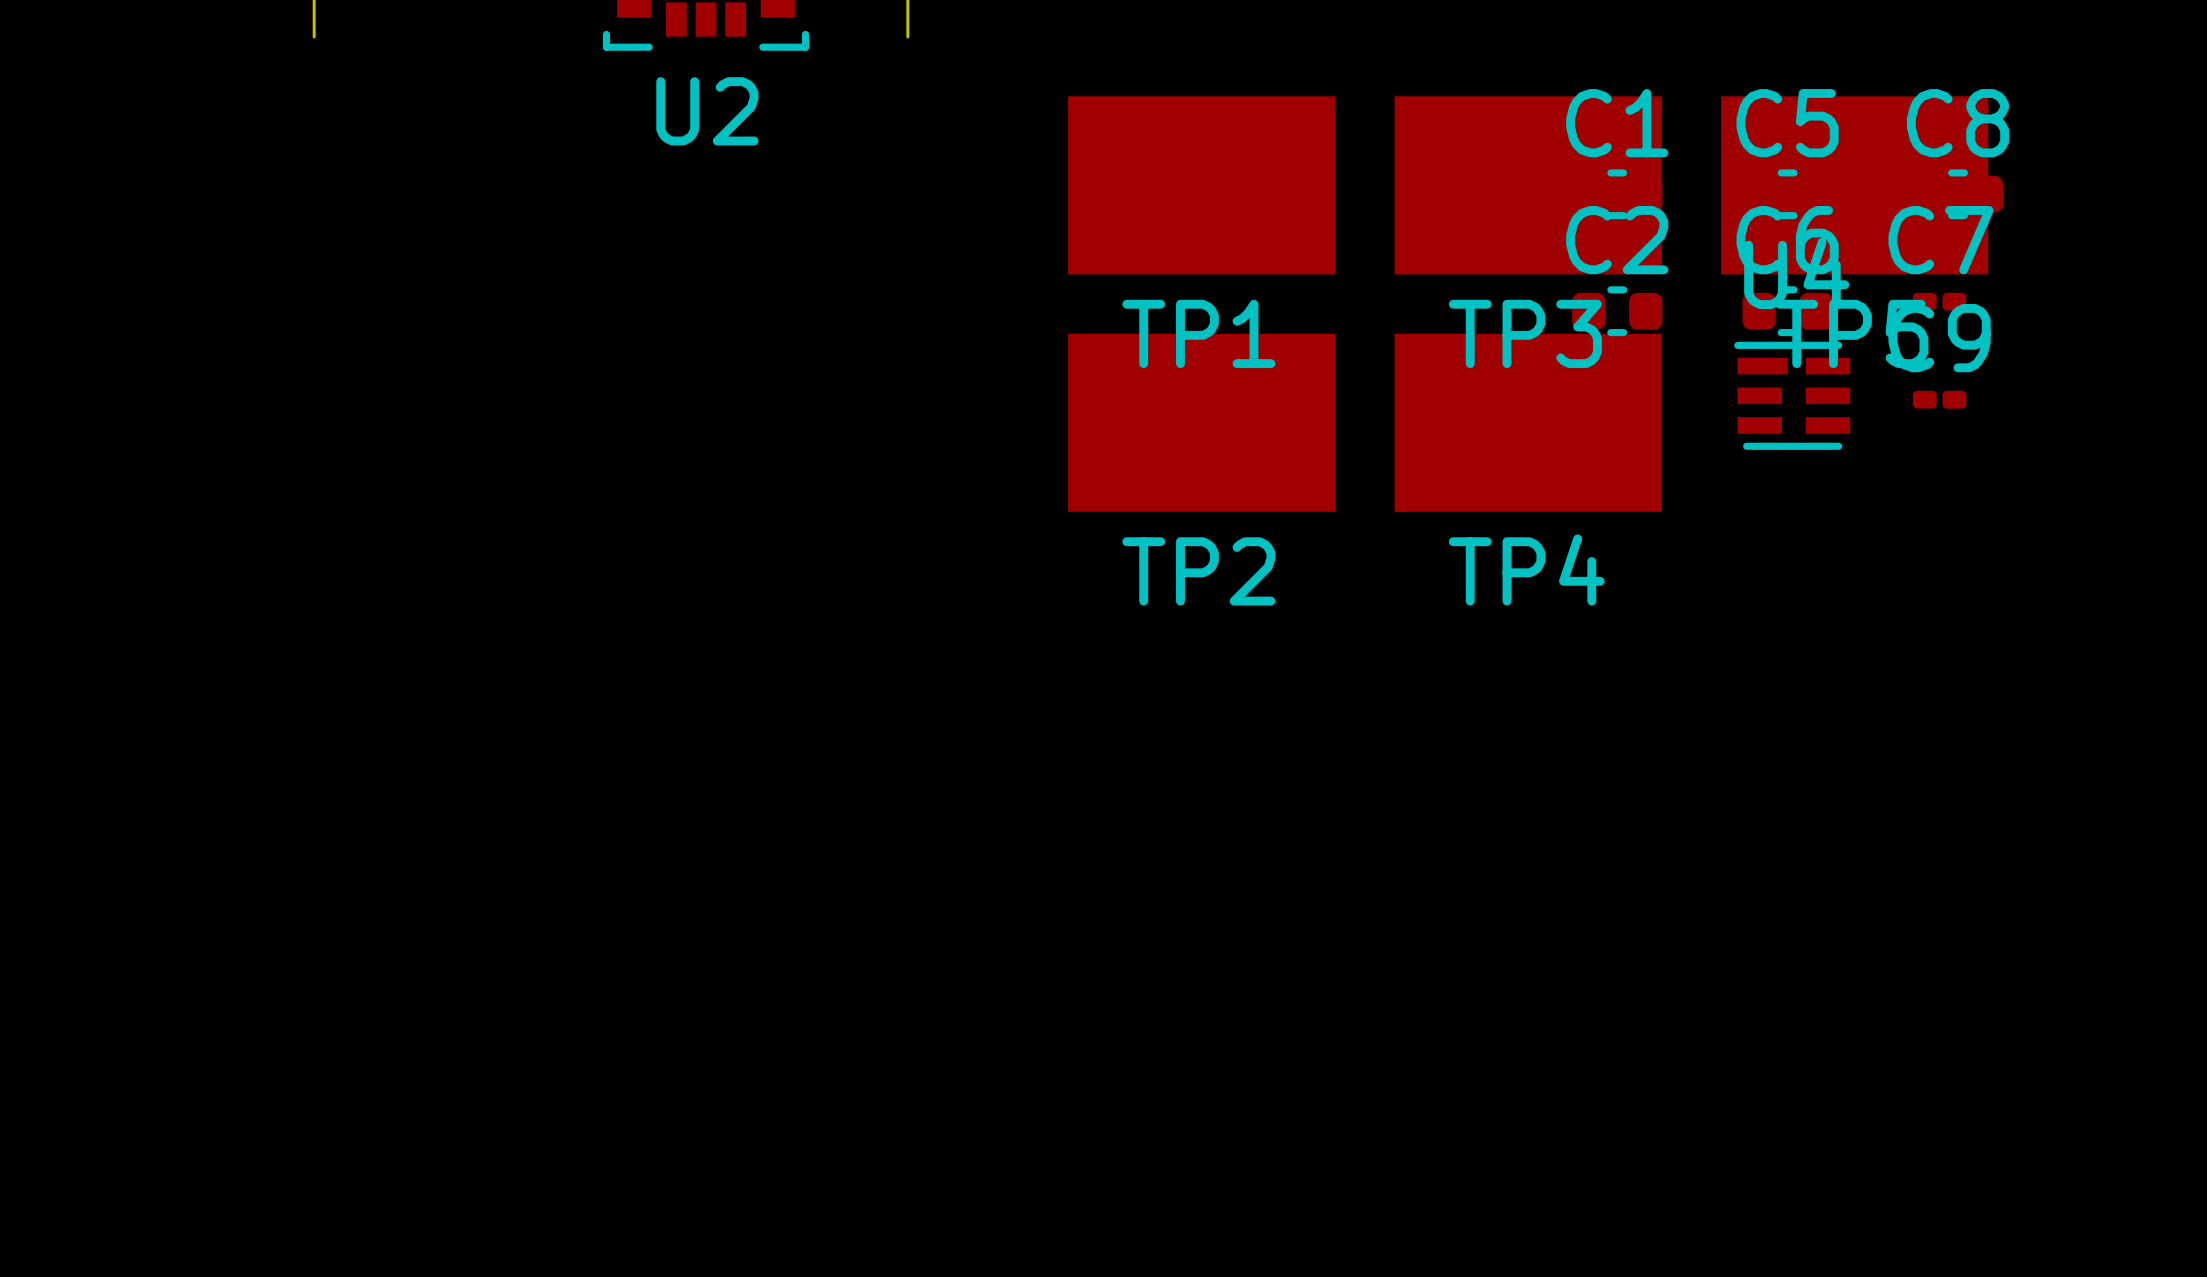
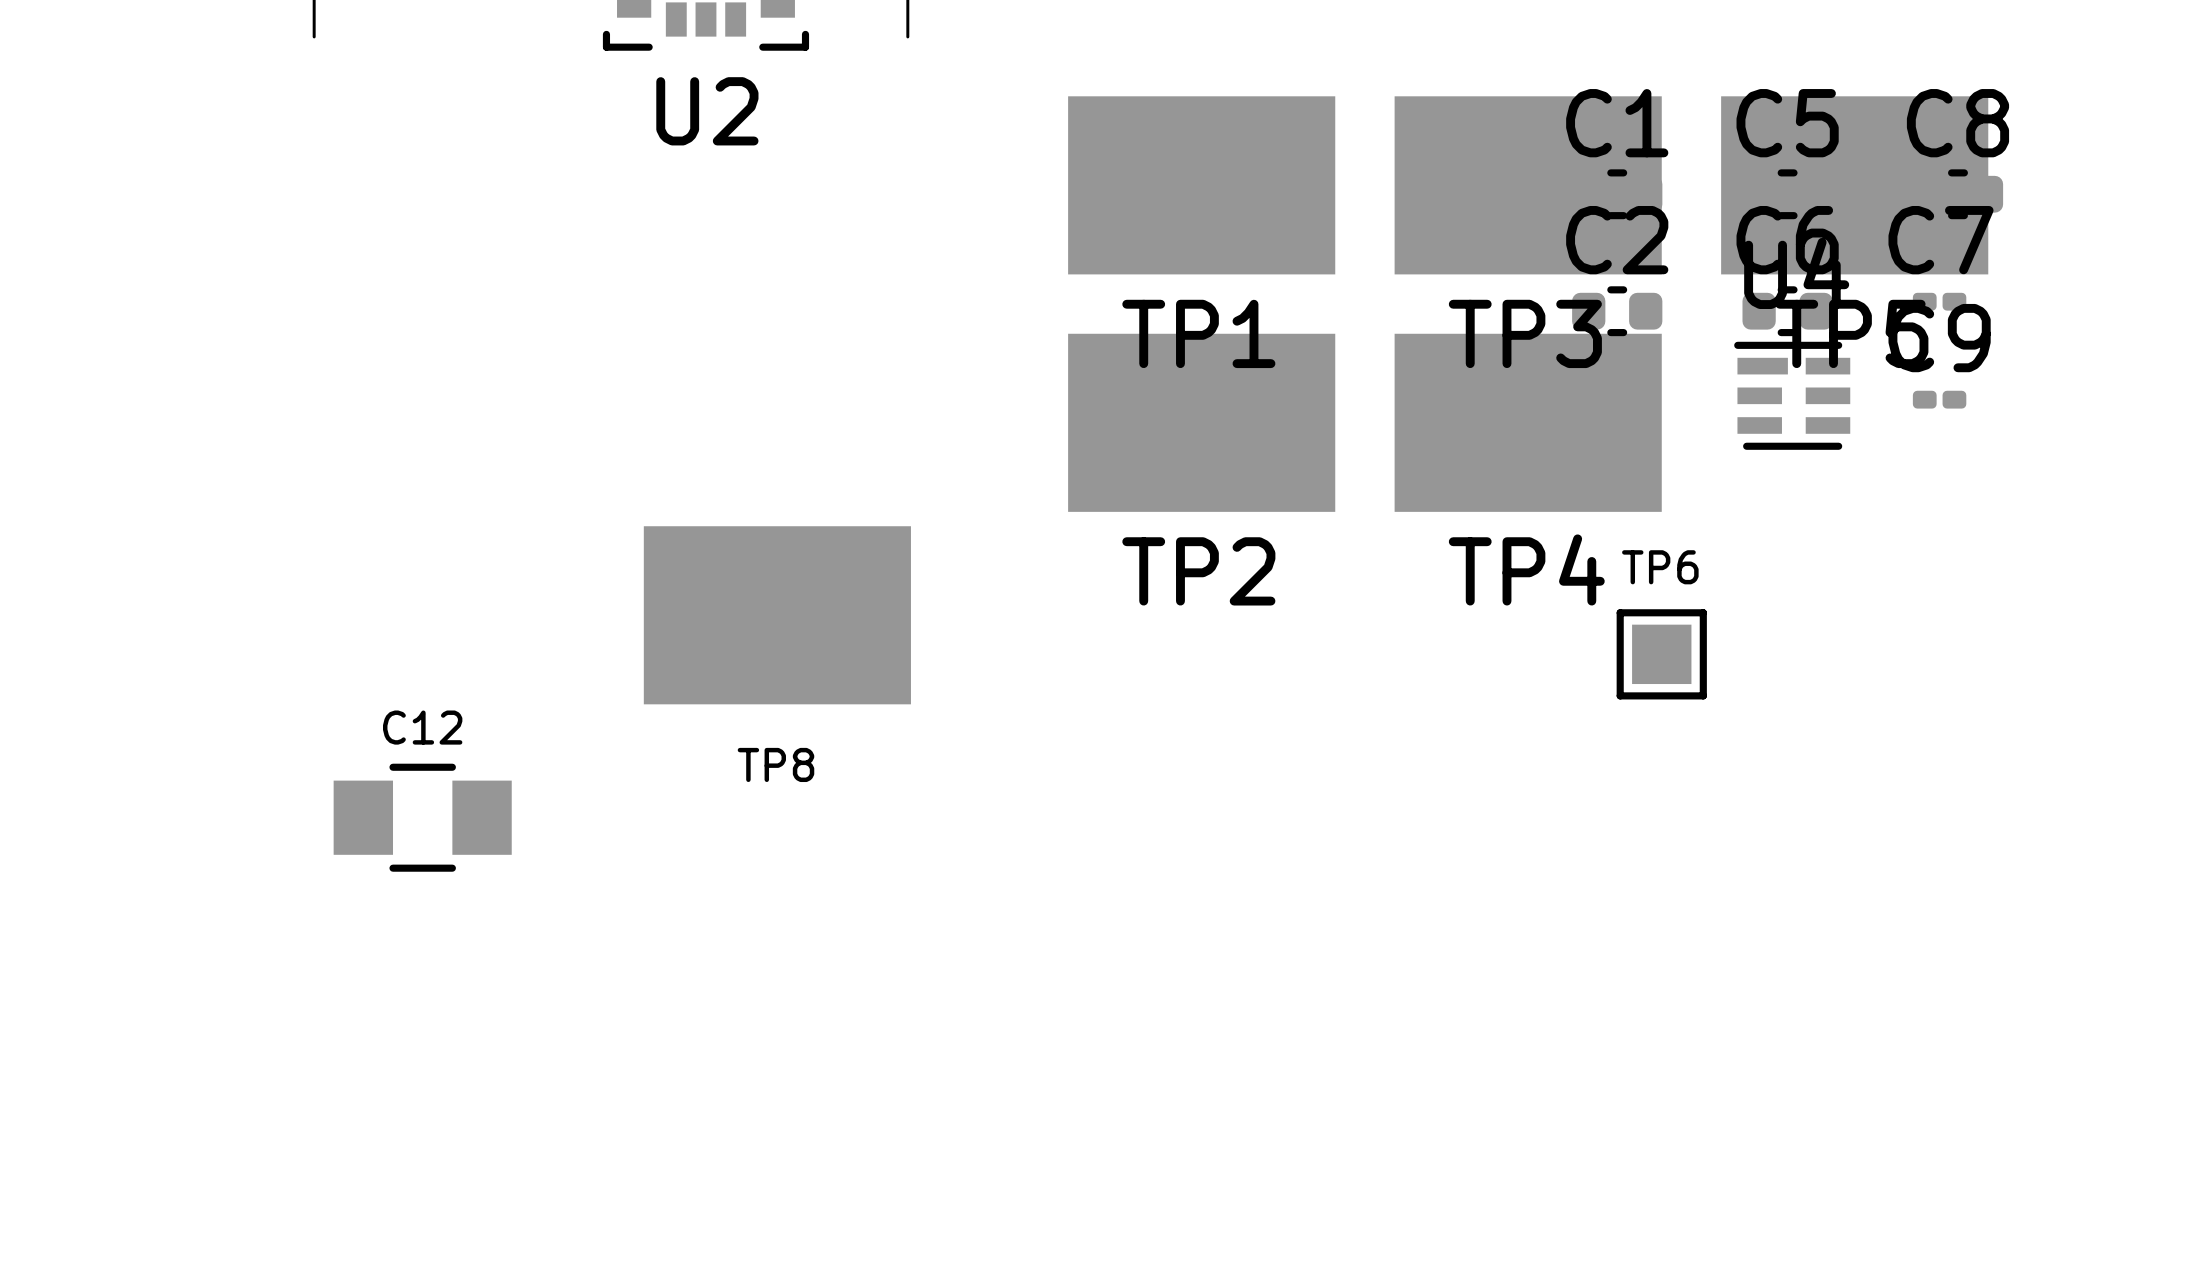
TP8: none -> (777, 615)
TP6: none -> (1661, 654)
C12: none -> (422, 817)

